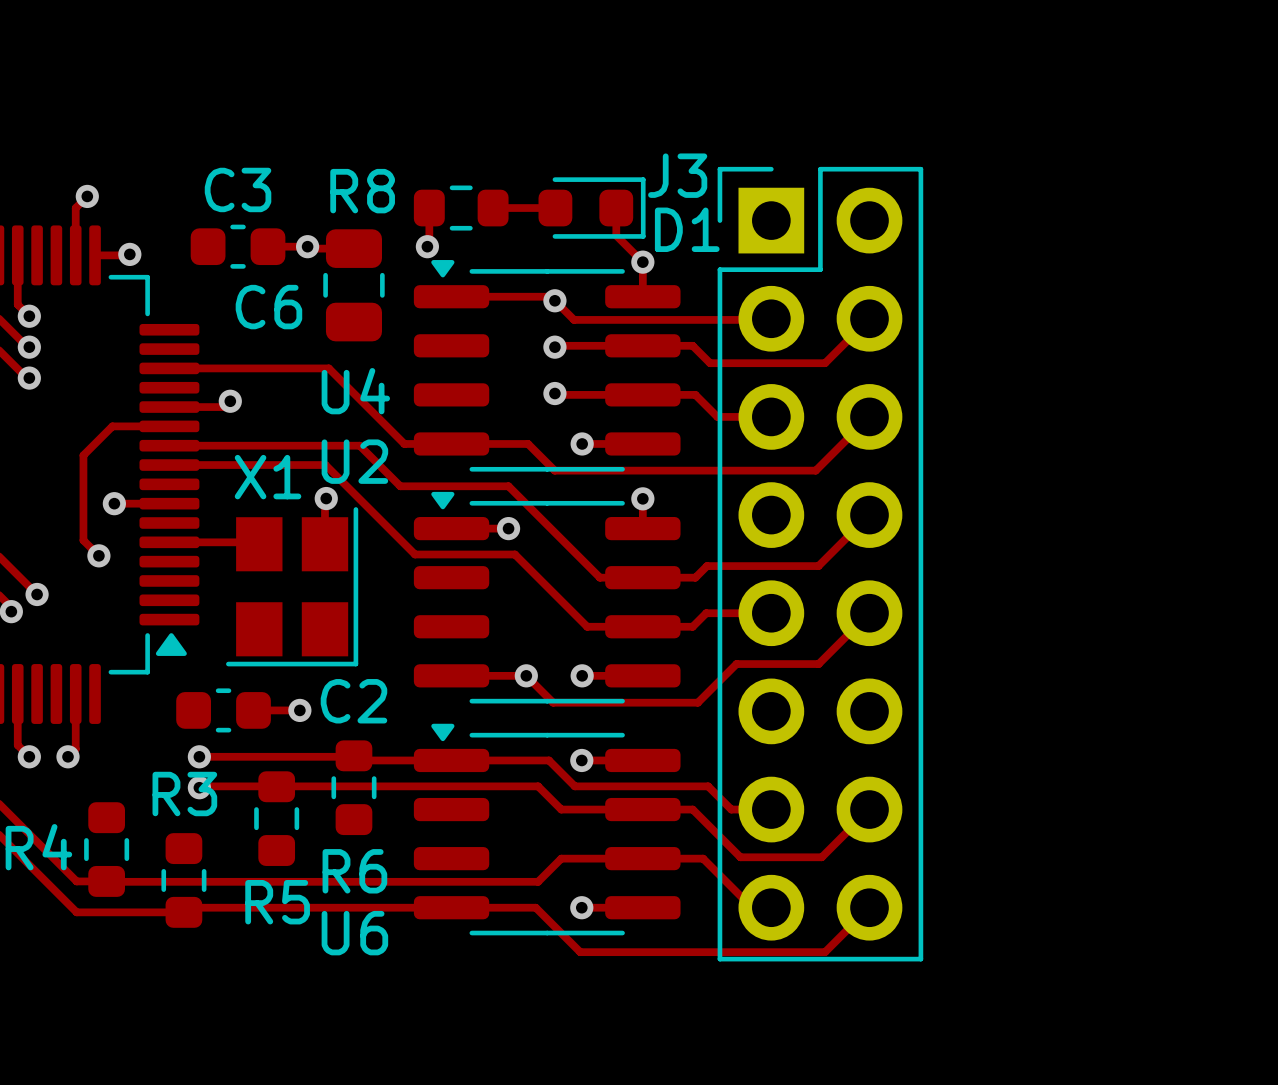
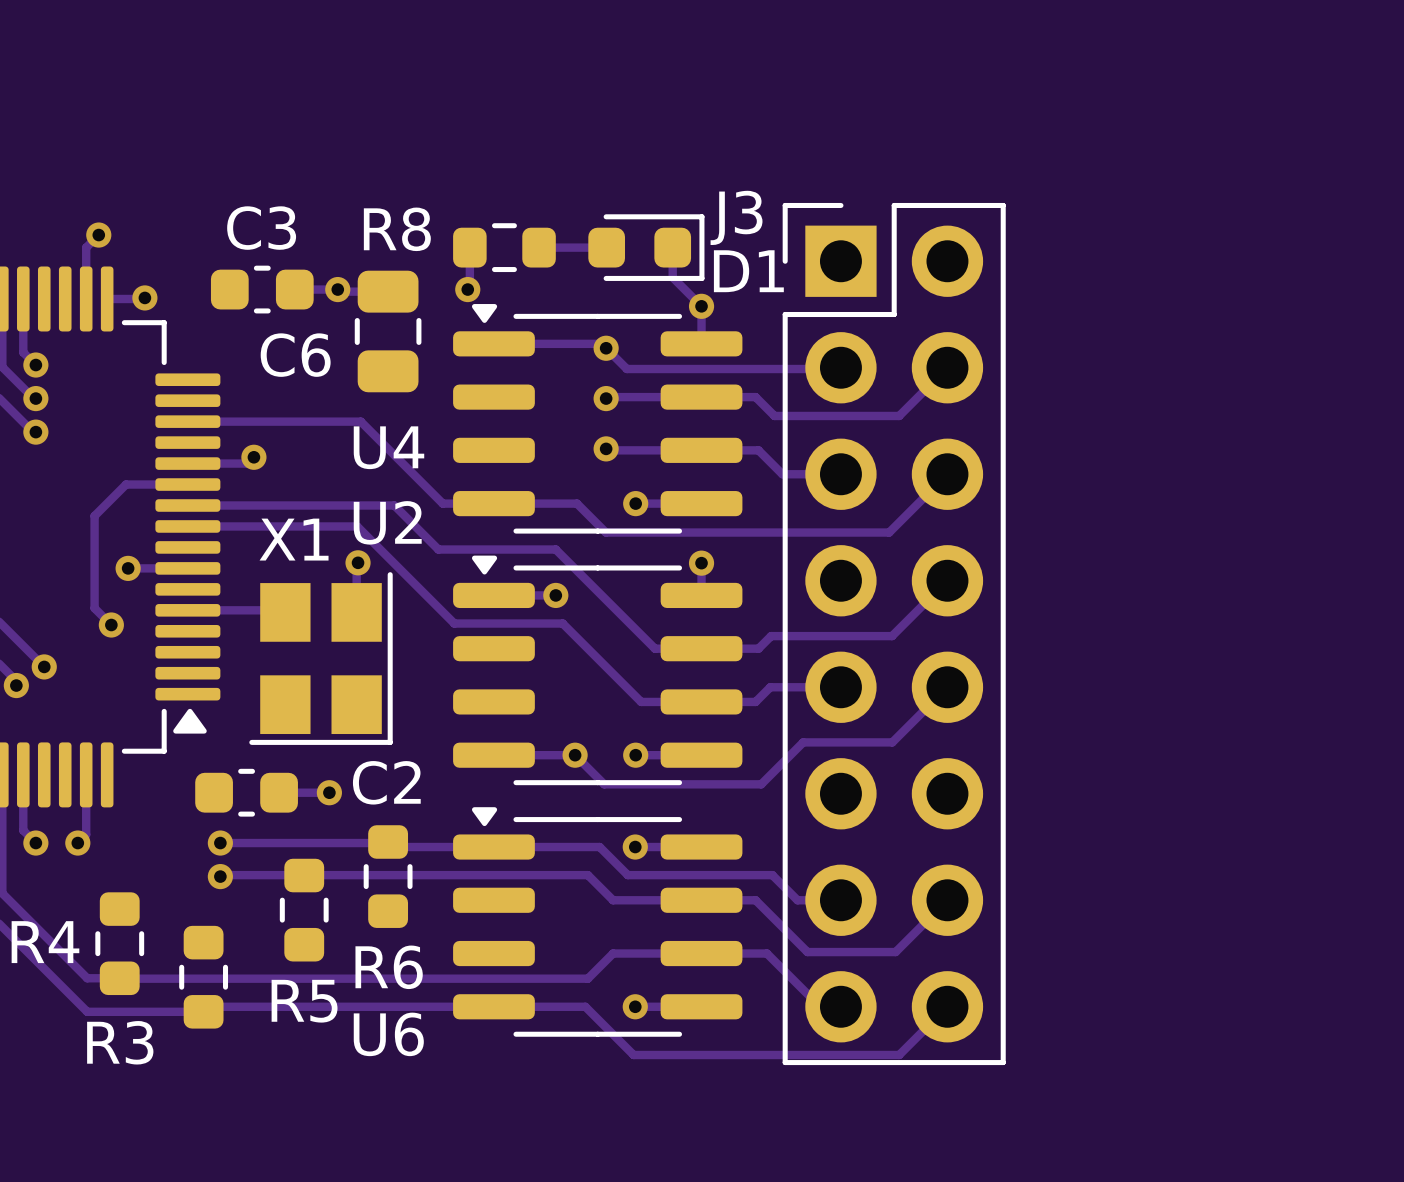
R3 name position: R3 (184, 794) -> R3 (120, 1042)

